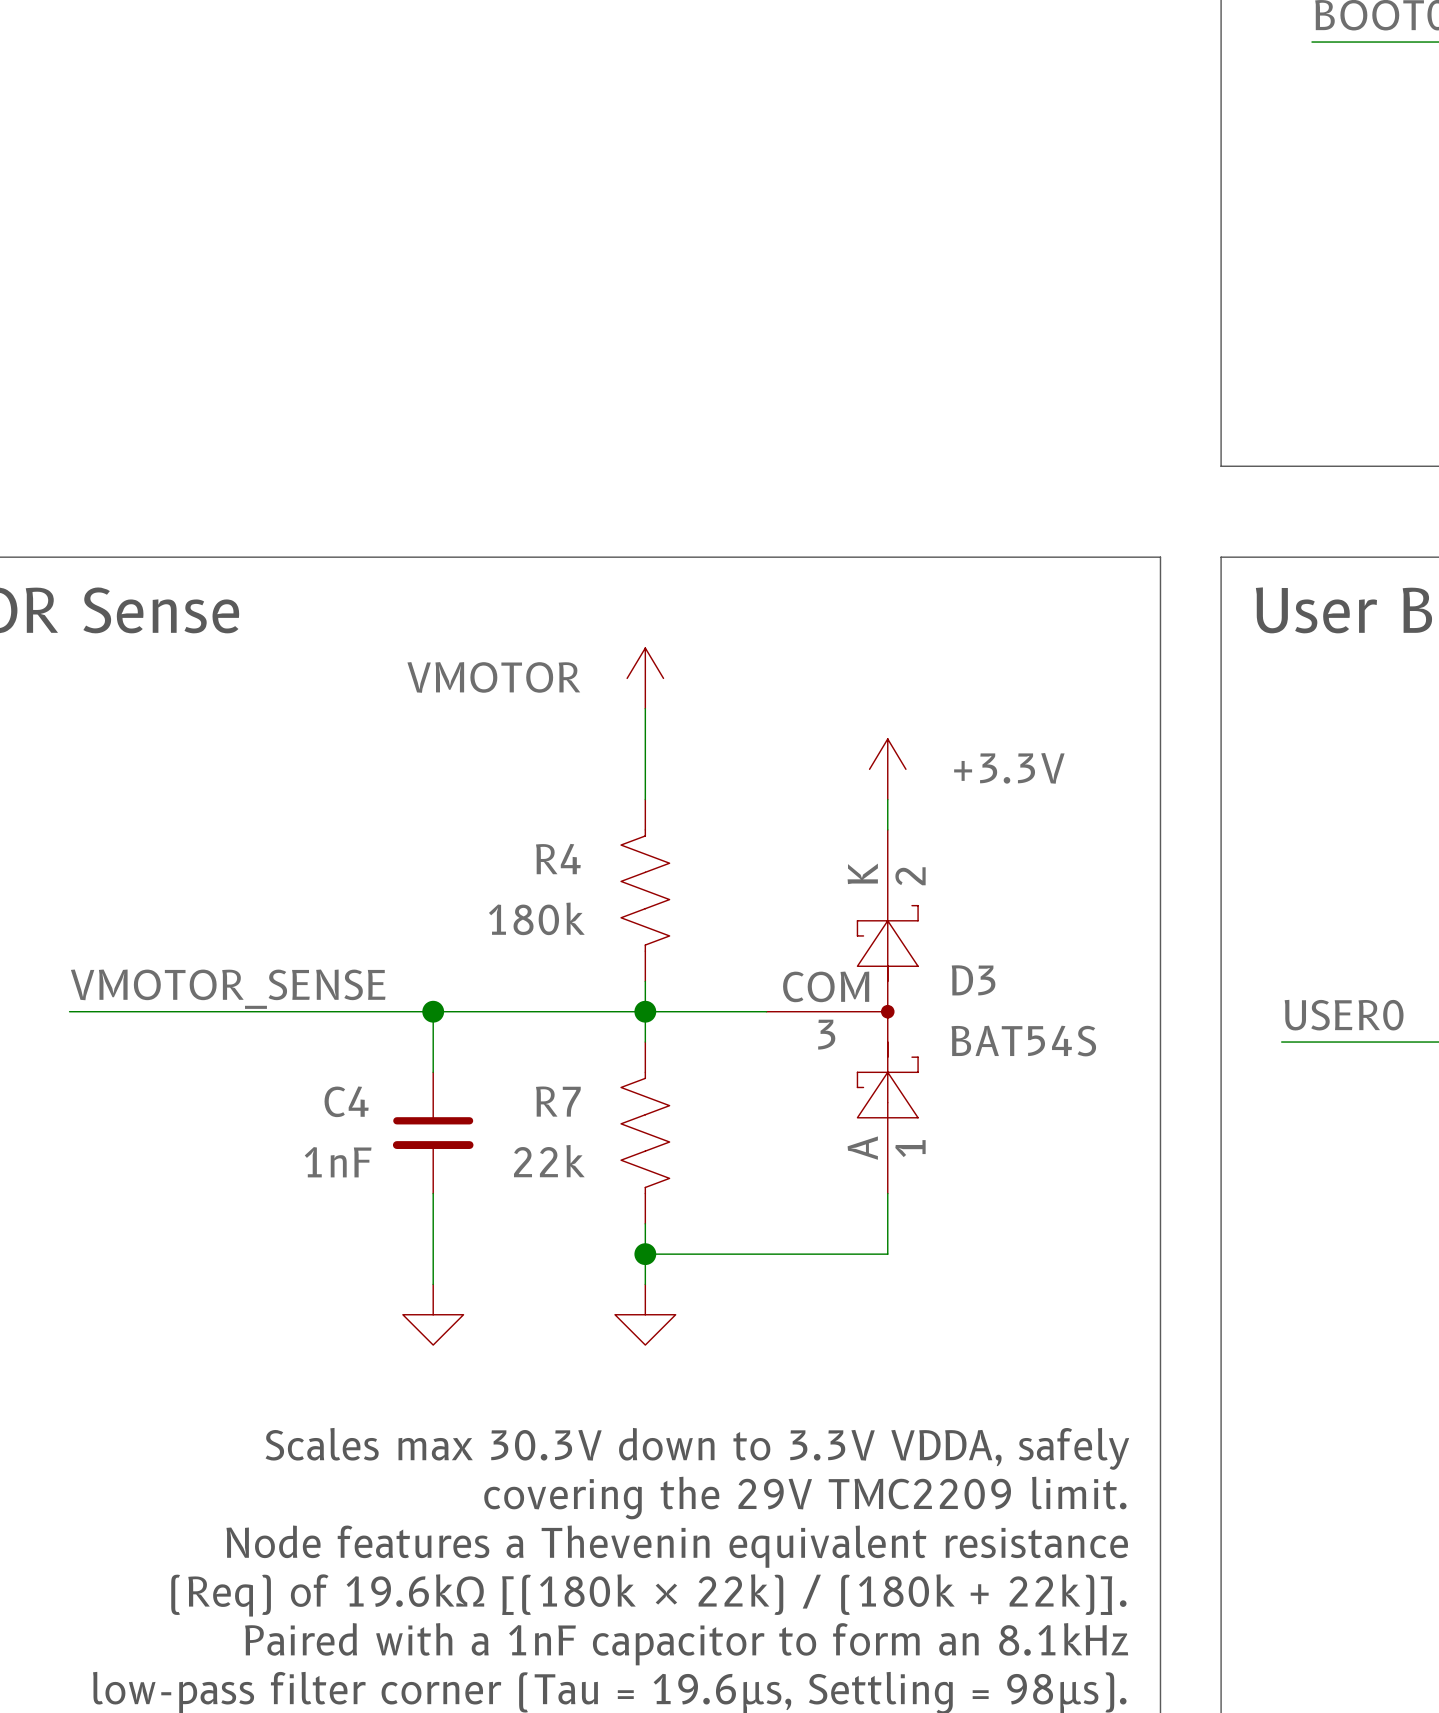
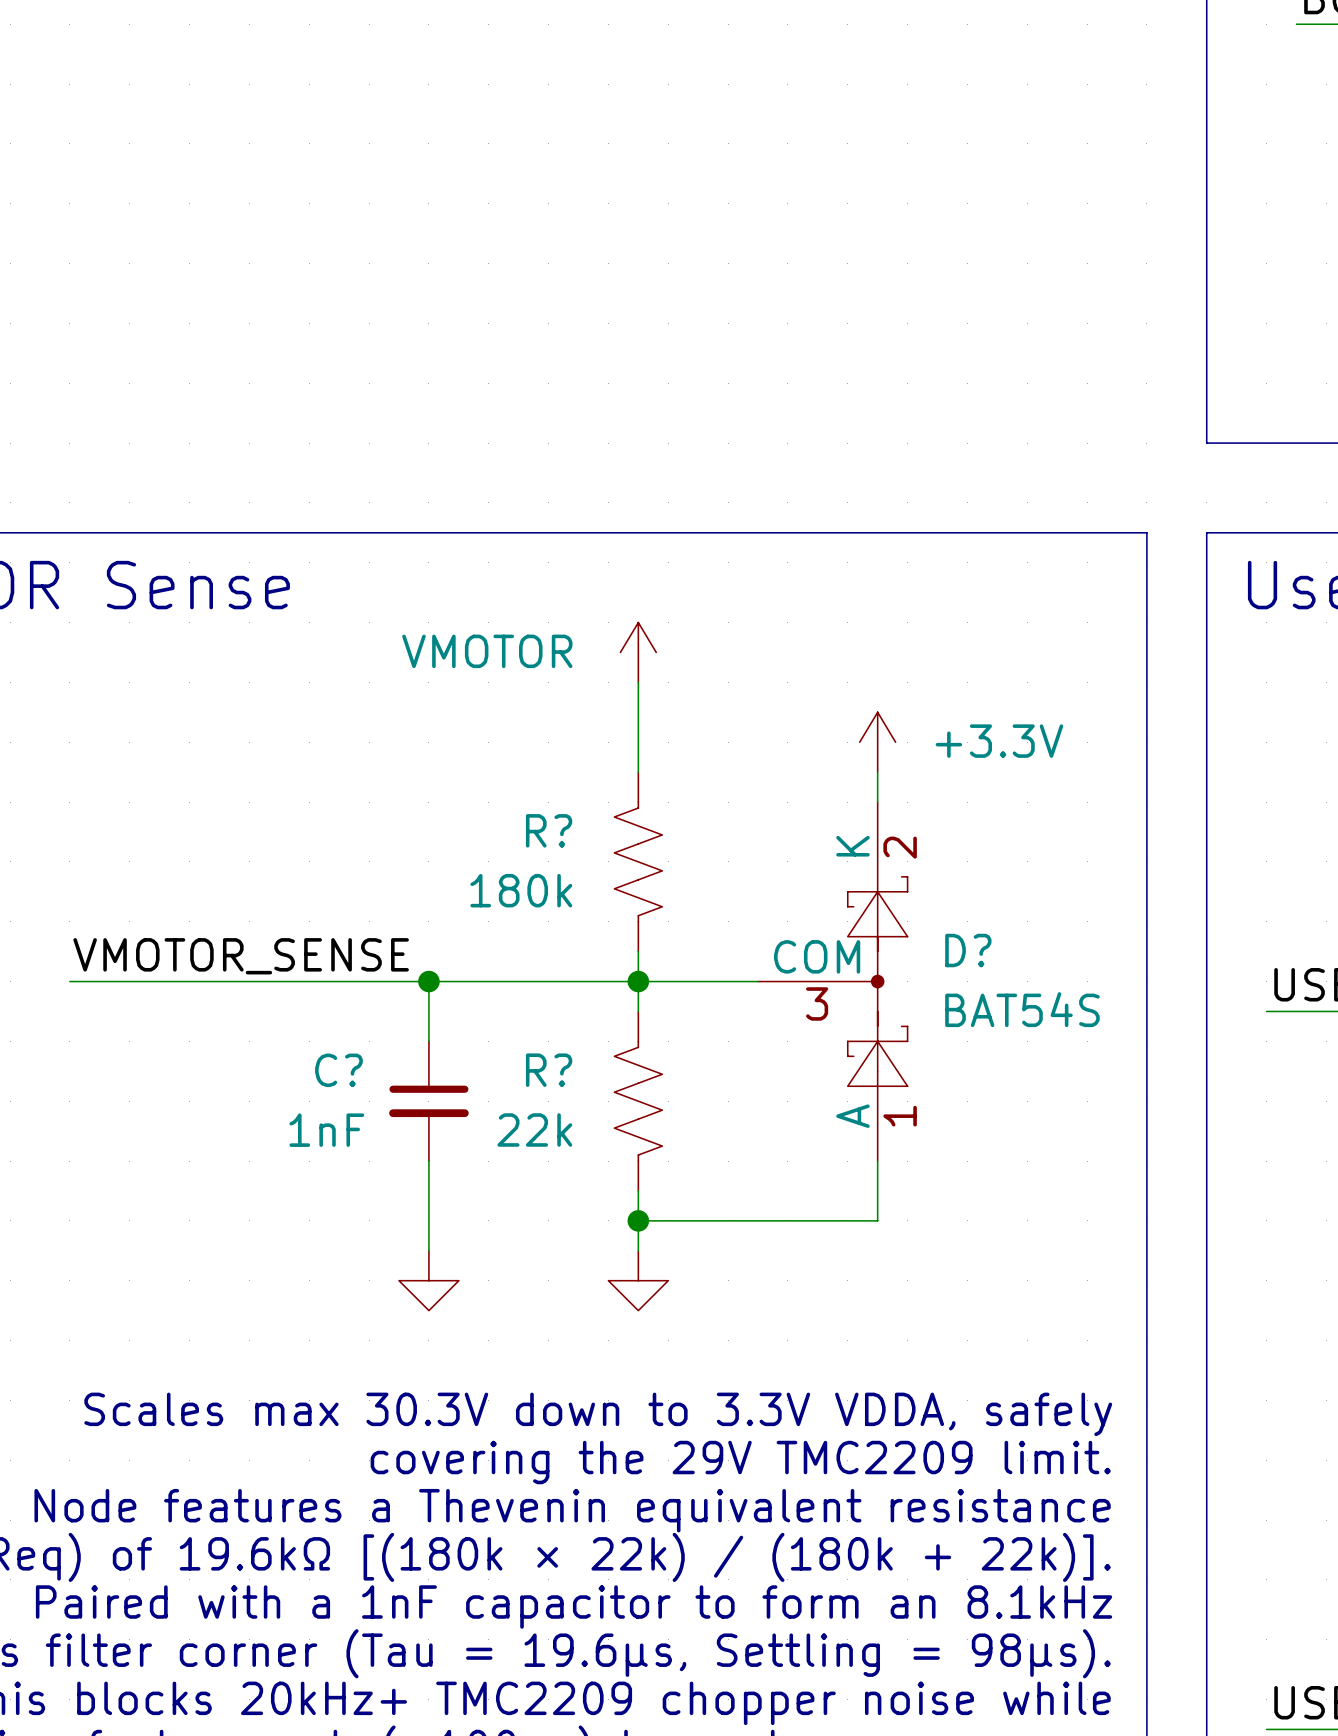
R4 name: R4 (558, 859) -> R? (549, 830)
D3 name: D3 (973, 980) -> D? (968, 950)
C4 name: C4 (346, 1101) -> C? (338, 1070)
R7 name: R7 (558, 1101) -> R? (549, 1070)

